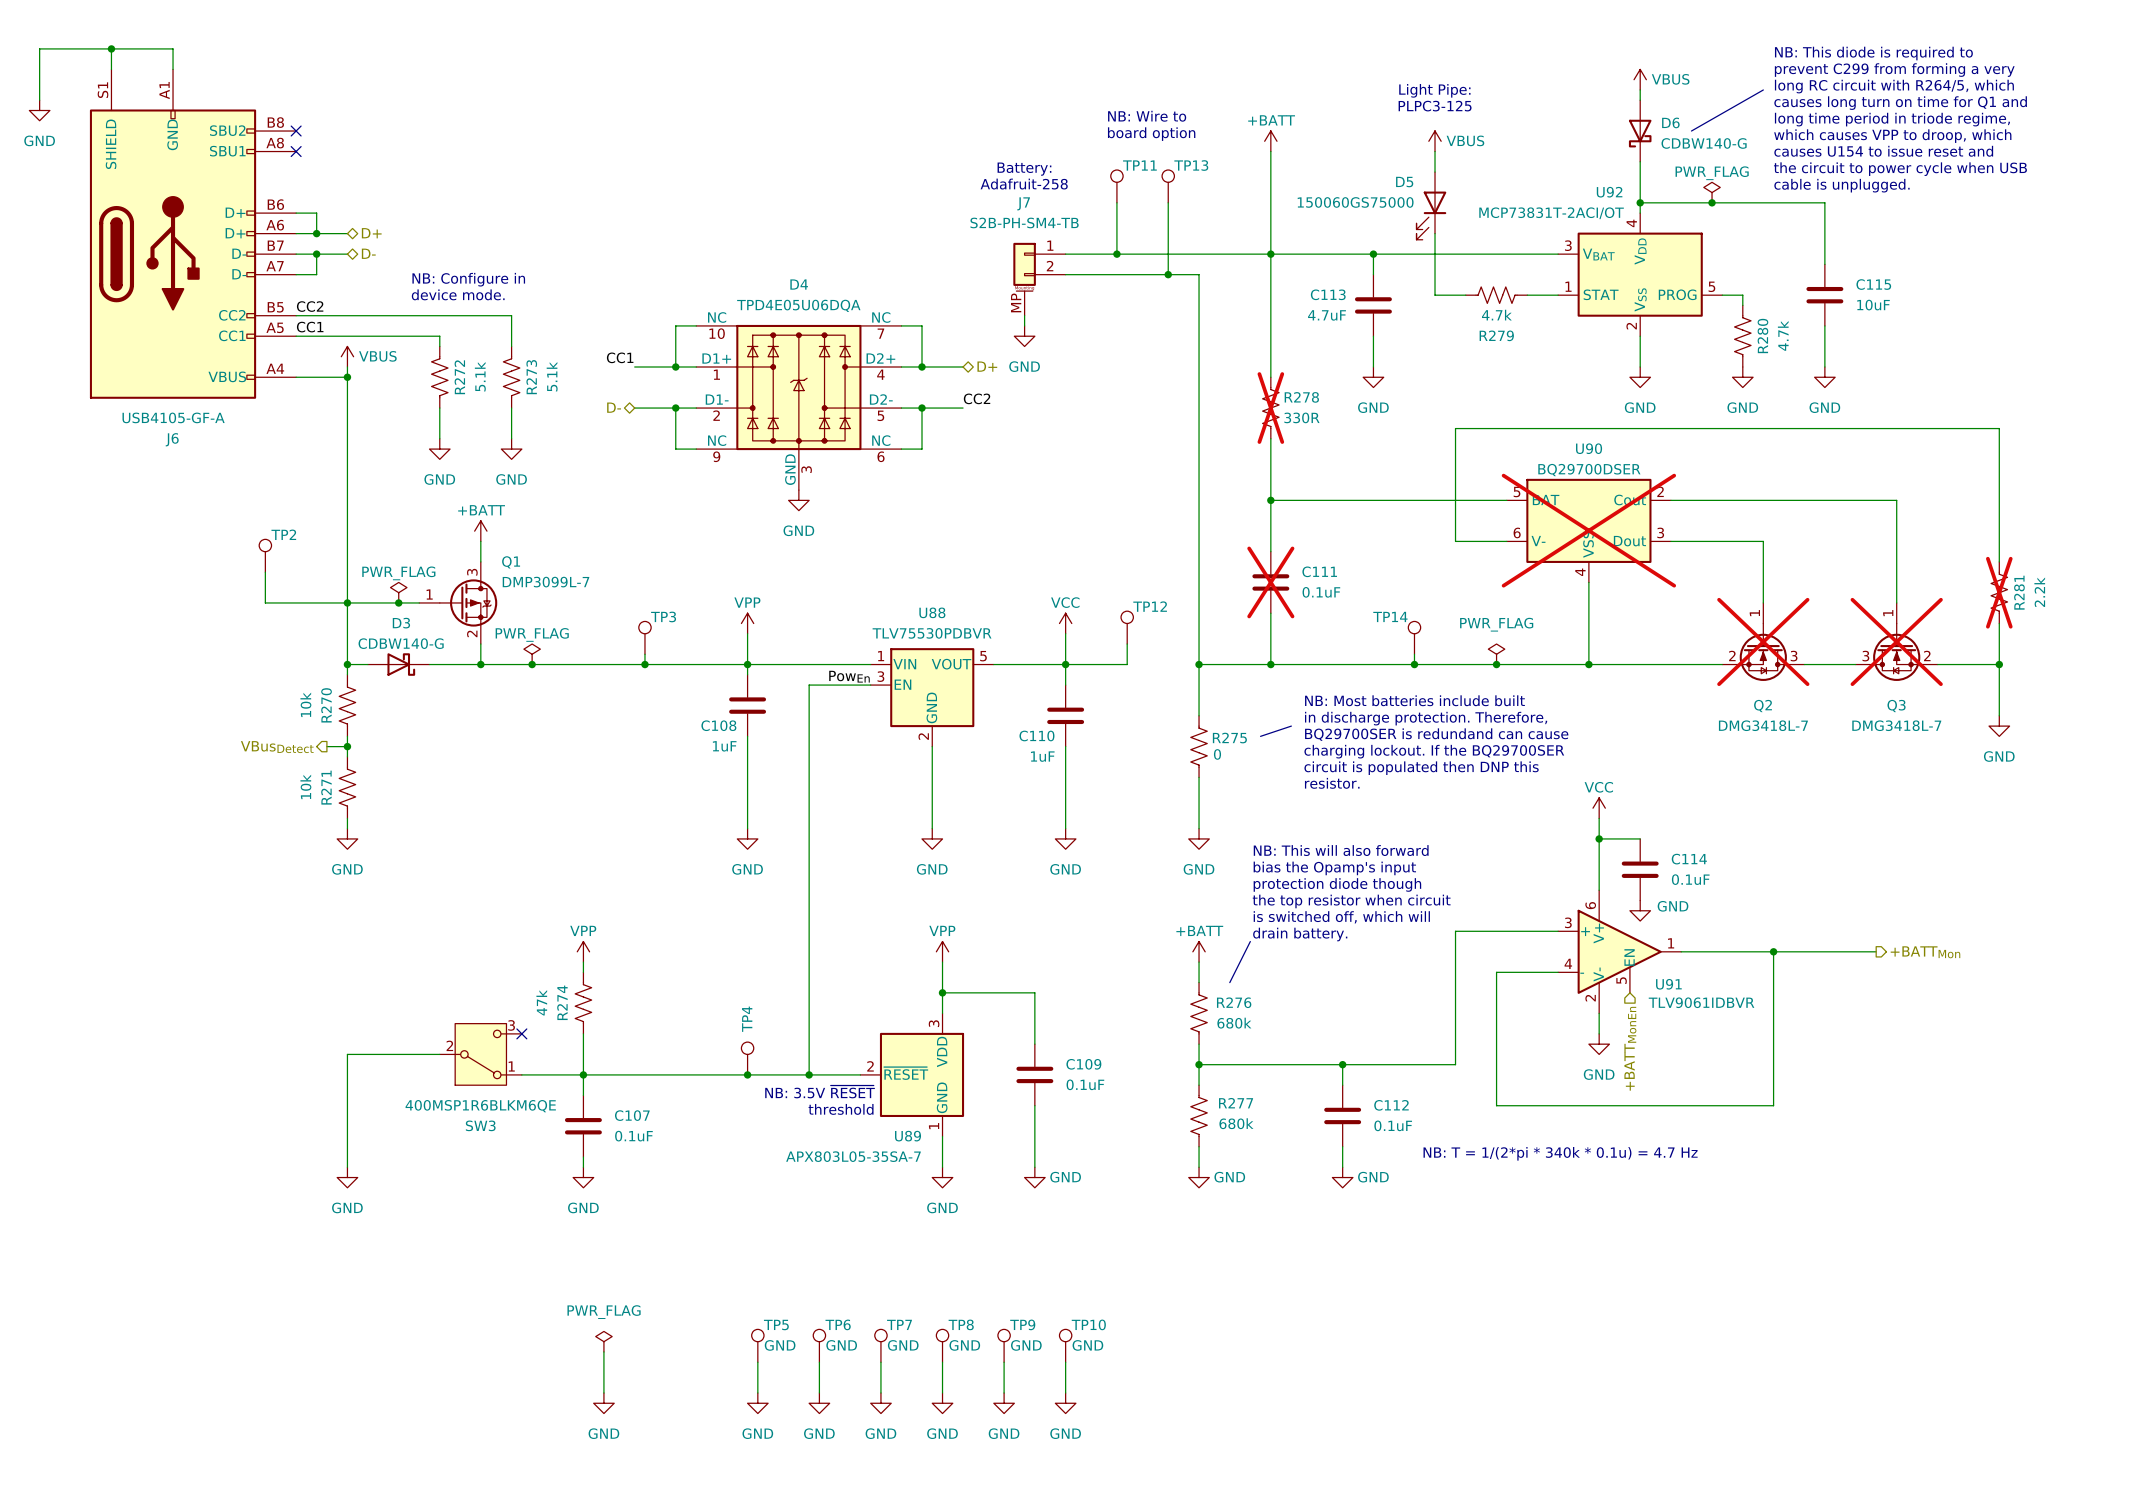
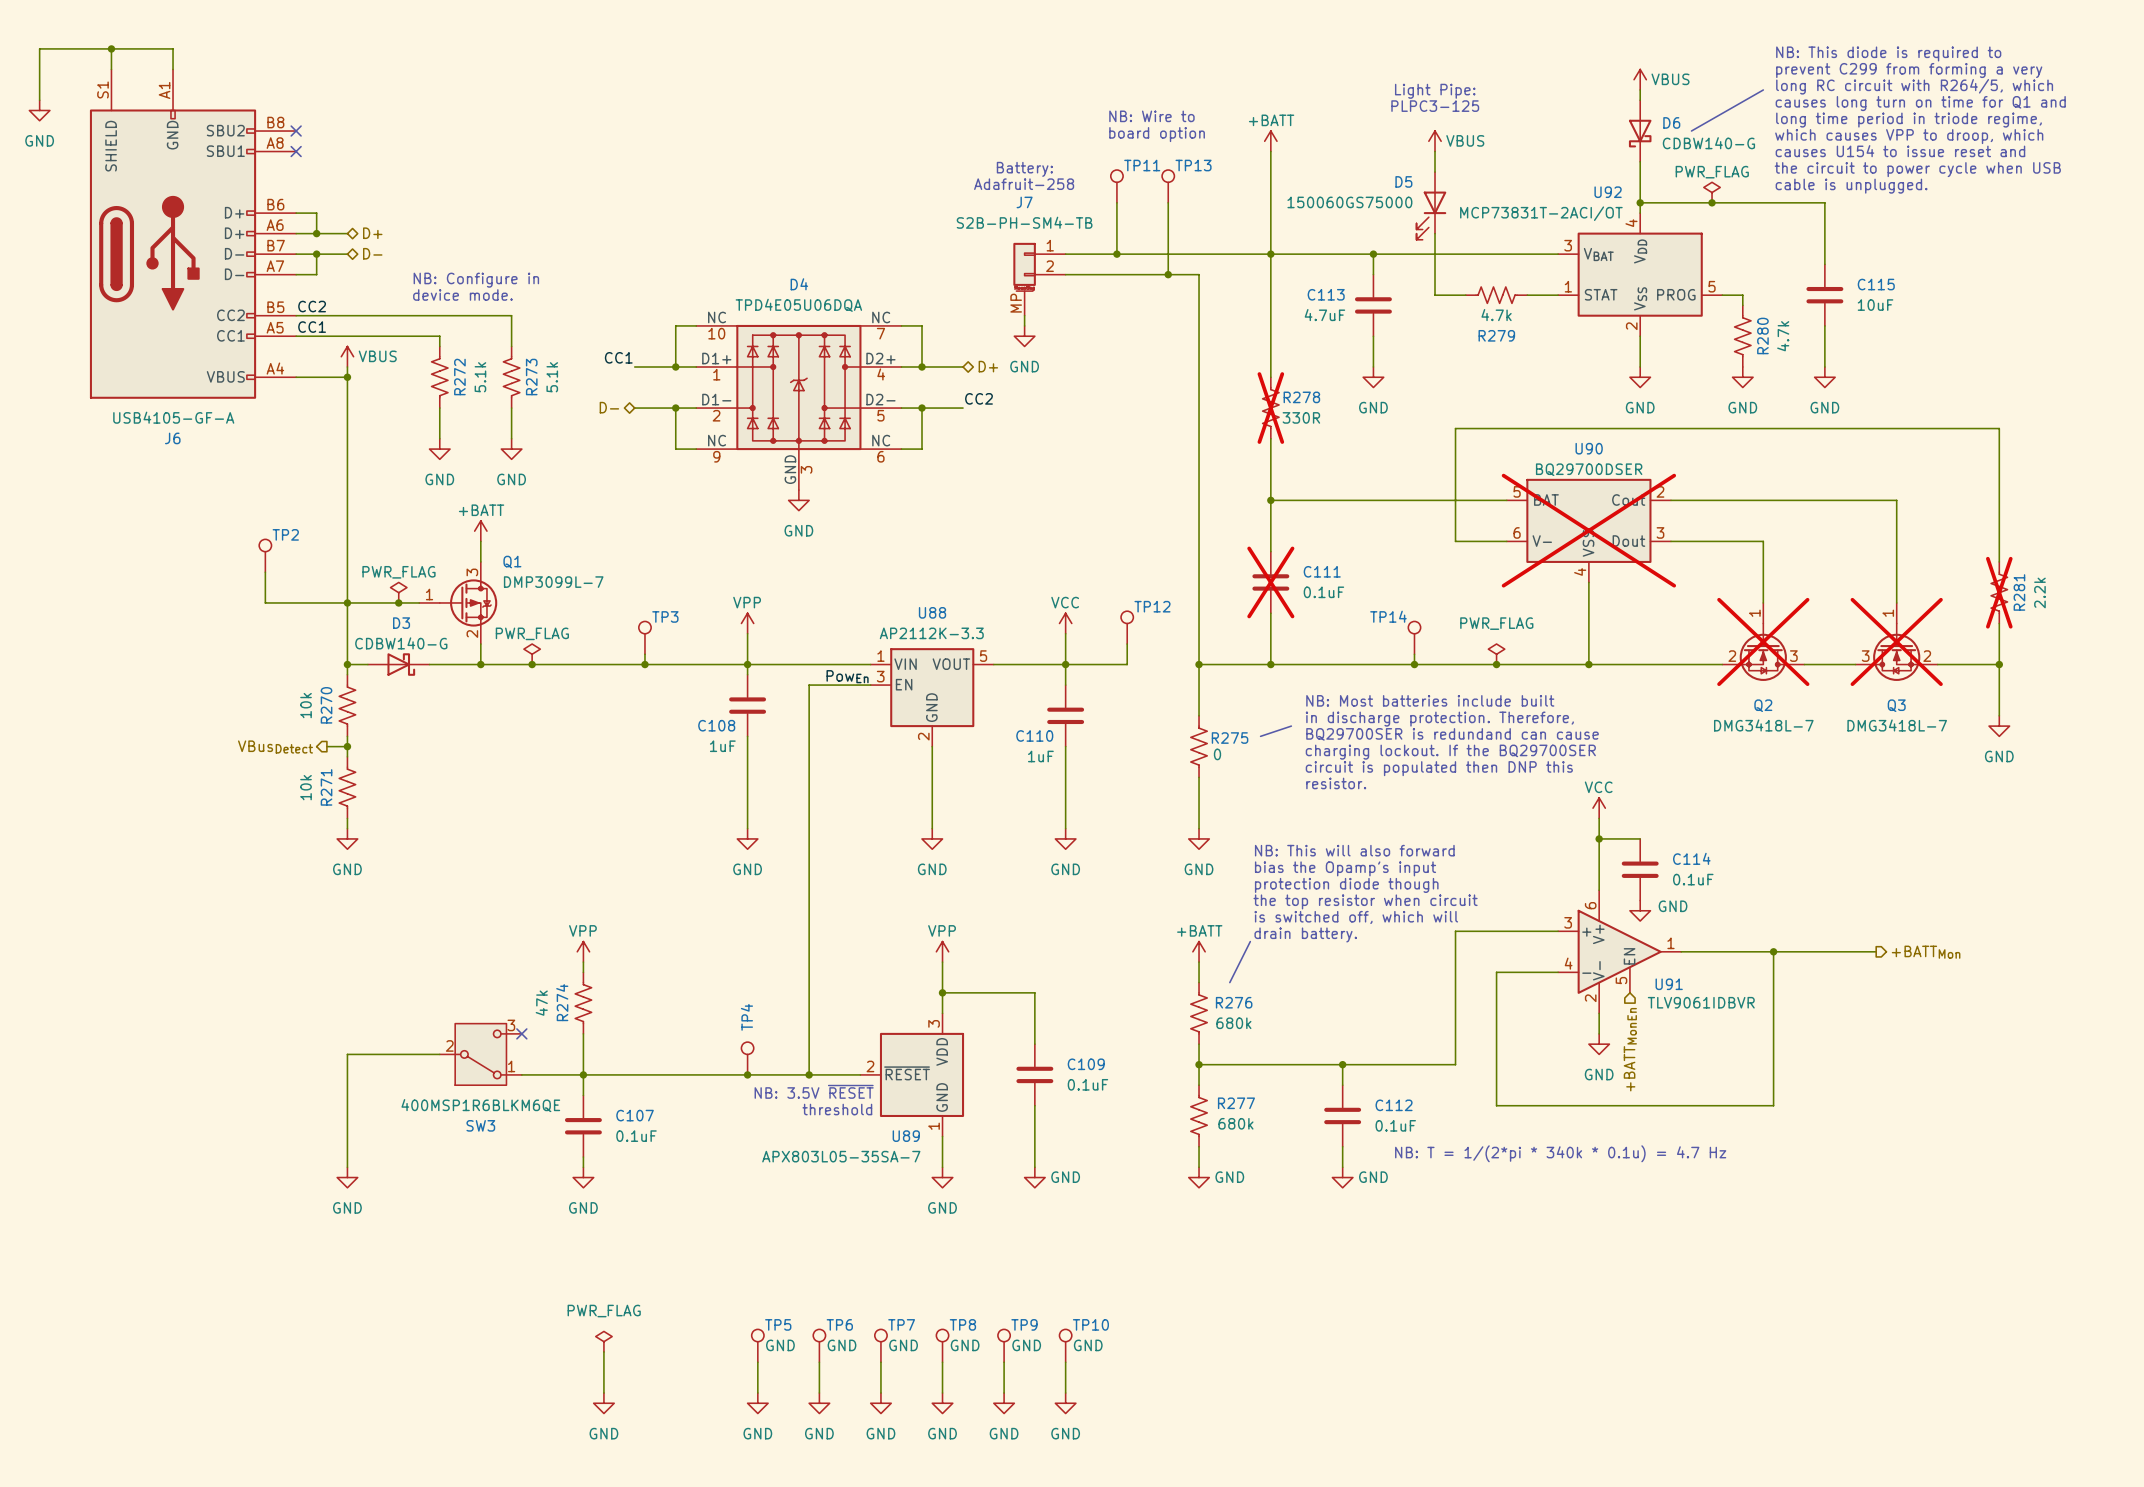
U88 value: TLV75530PDBVR (932, 633) -> AP2112K-3.3 (931, 633)

